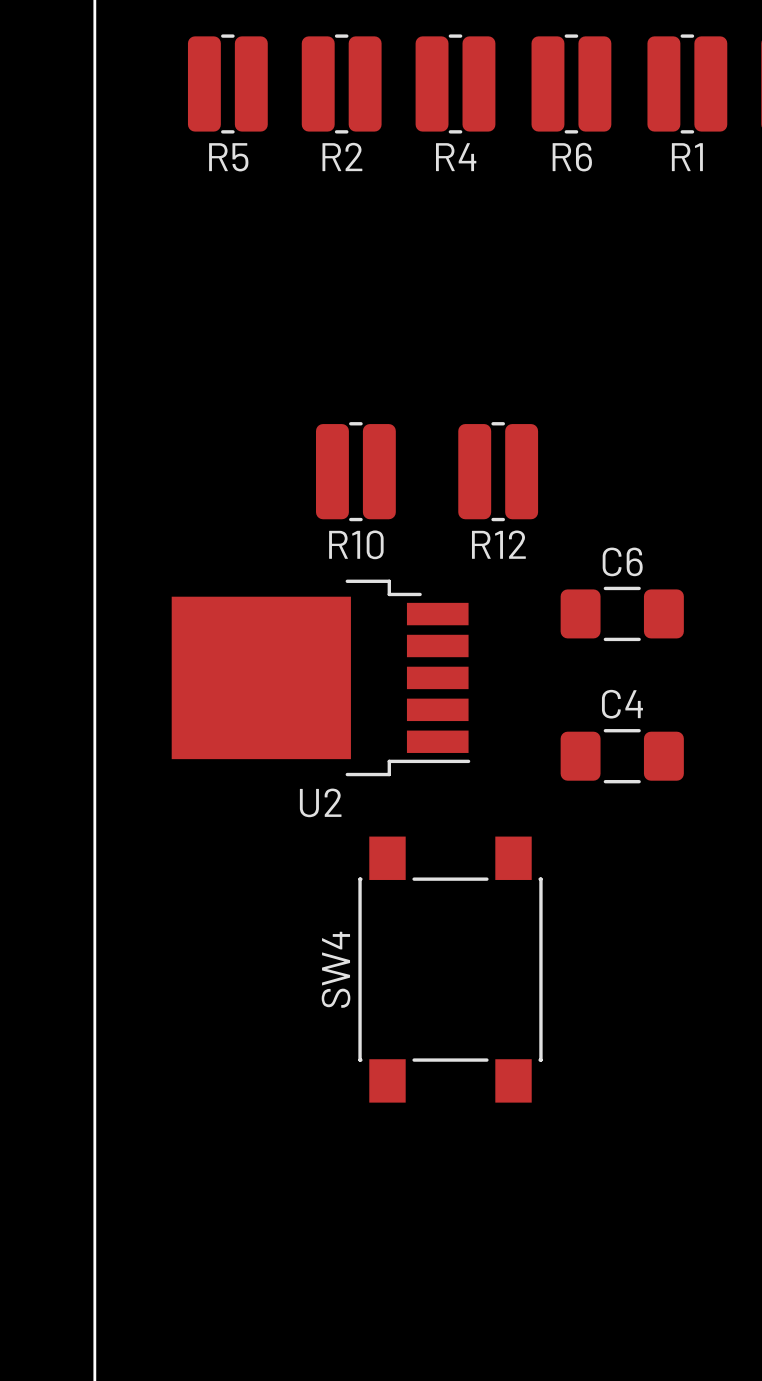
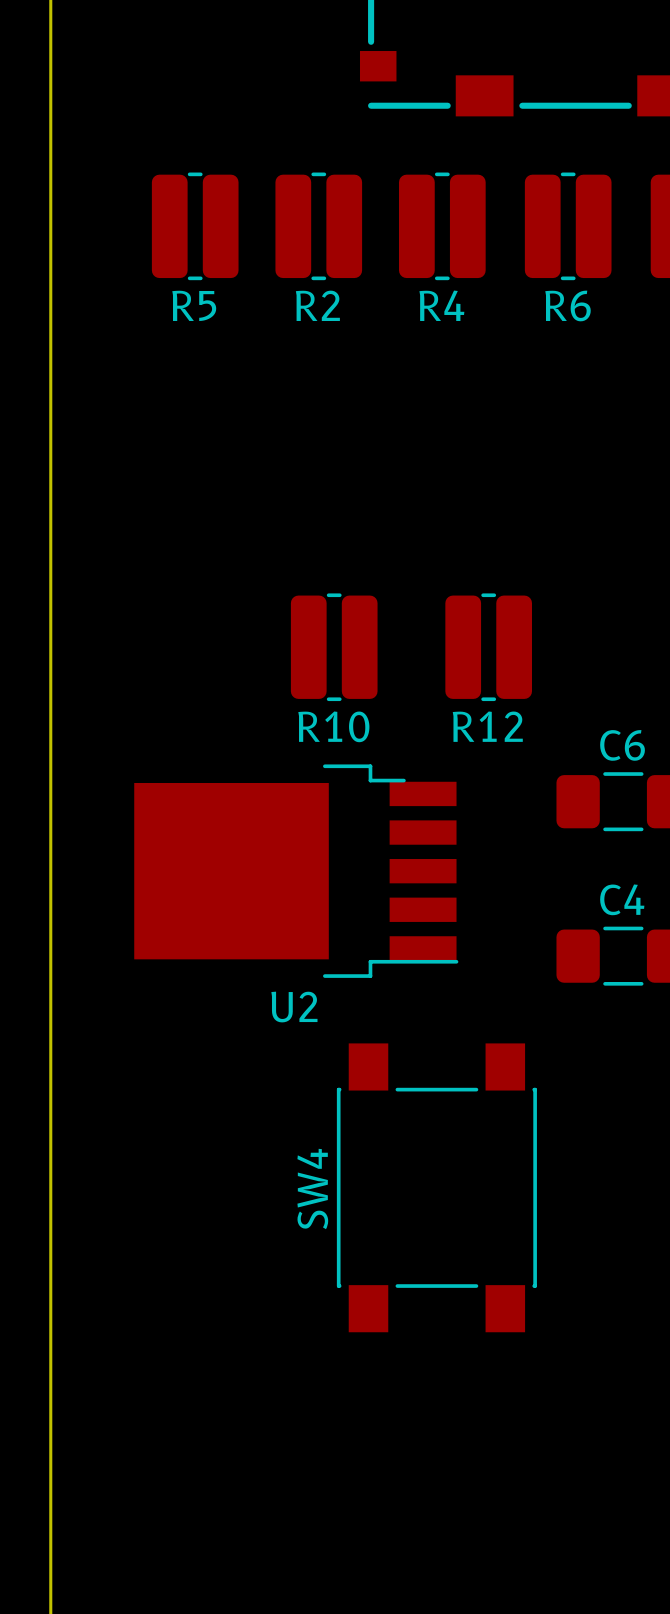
U2 footprint: [171, 579, 471, 777] -> [134, 764, 459, 978]

